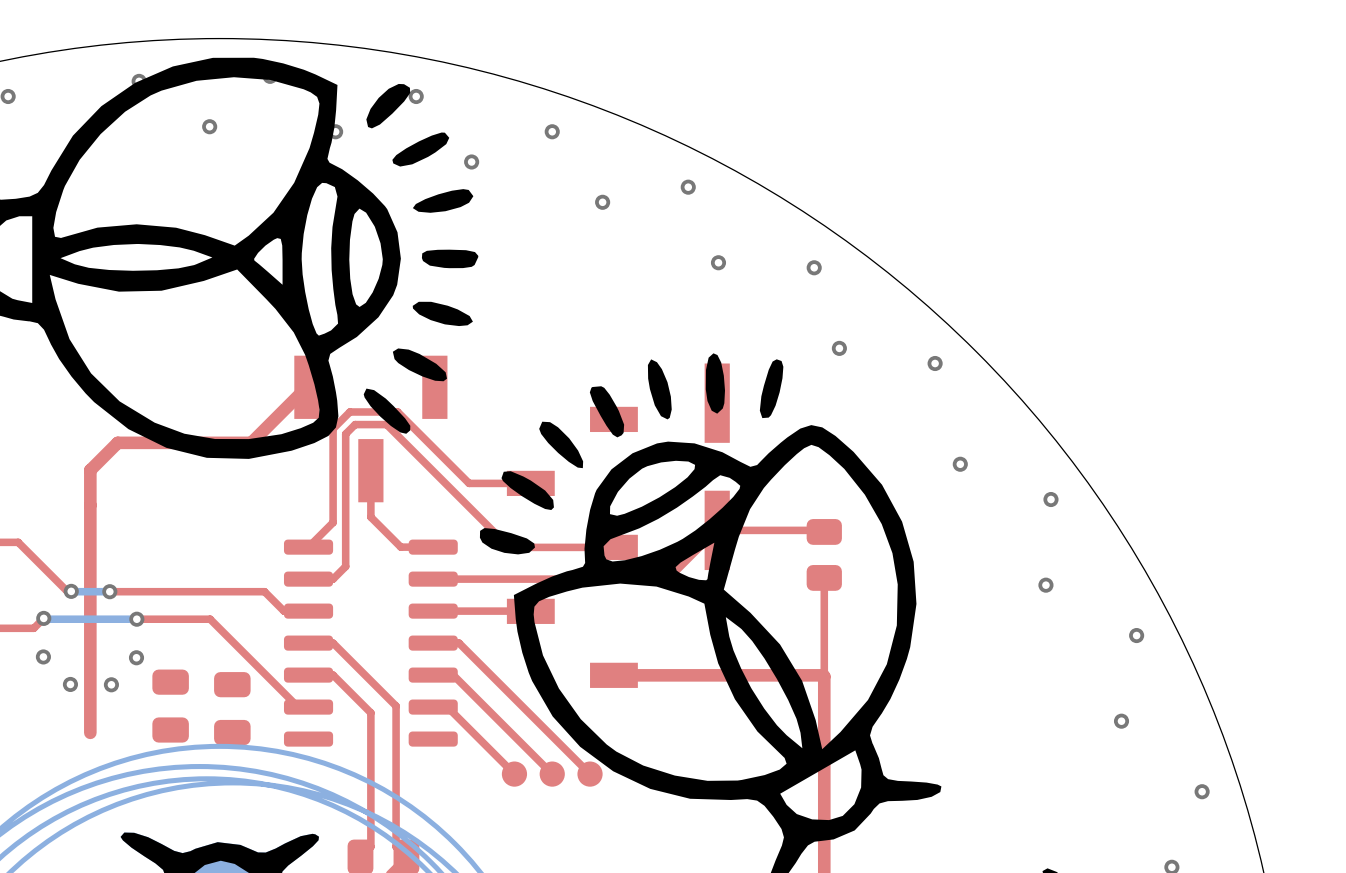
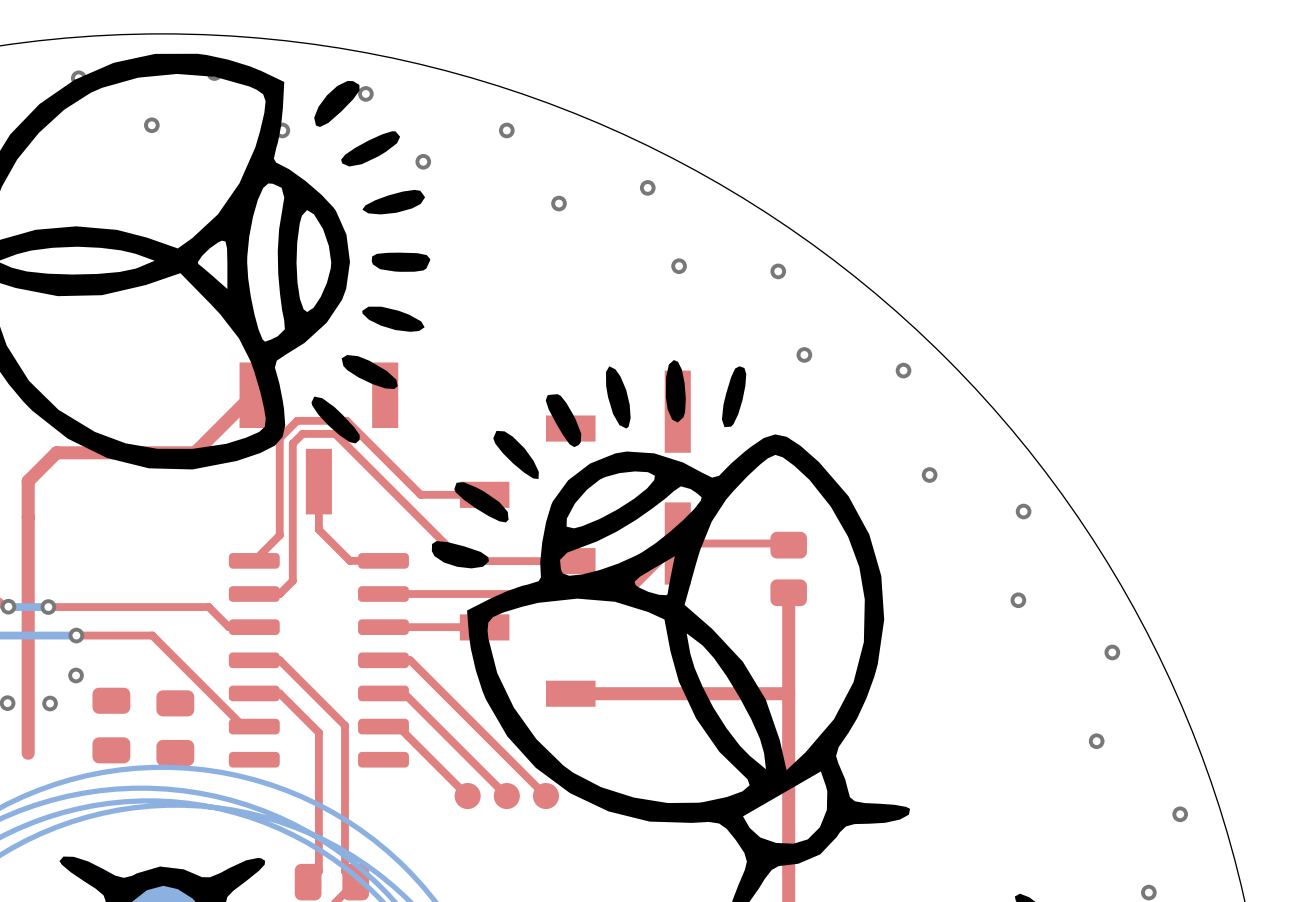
top track width: thin (824, 577) (823, 675) -> thick (788, 592) (787, 693)

